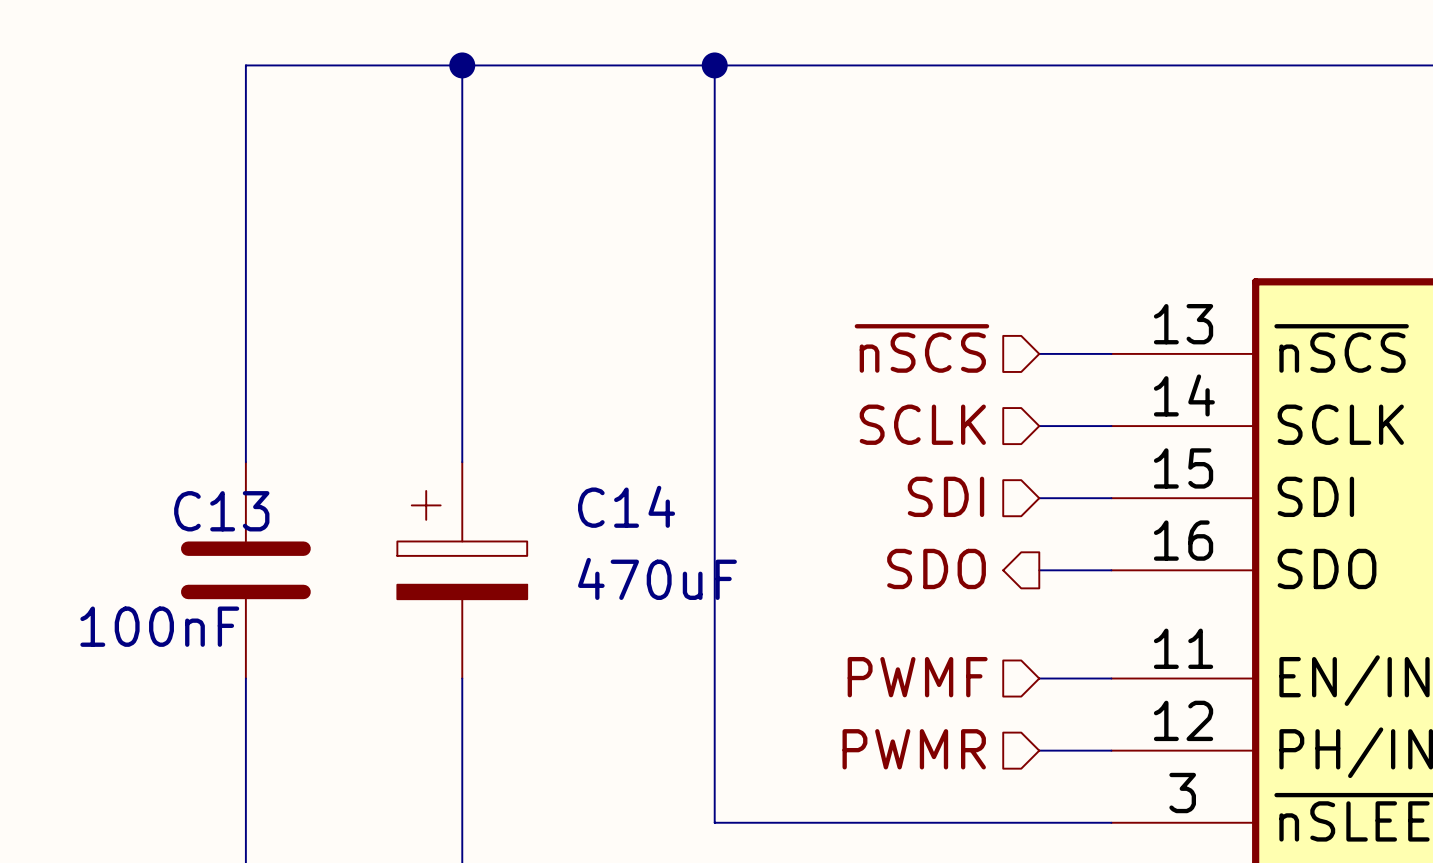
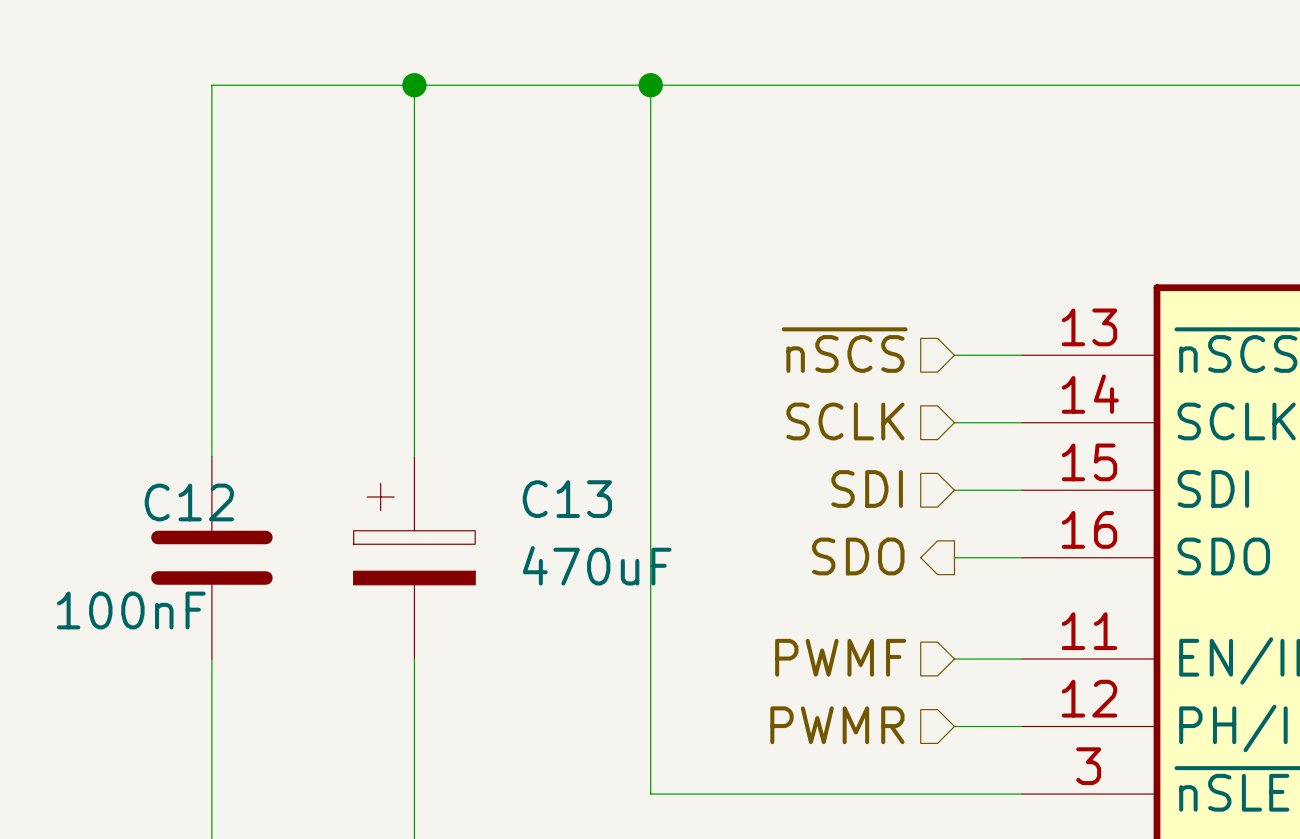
C14 name: C14 (626, 506) -> C13 (567, 499)
C13 name: C13 (221, 511) -> C12 (189, 502)

